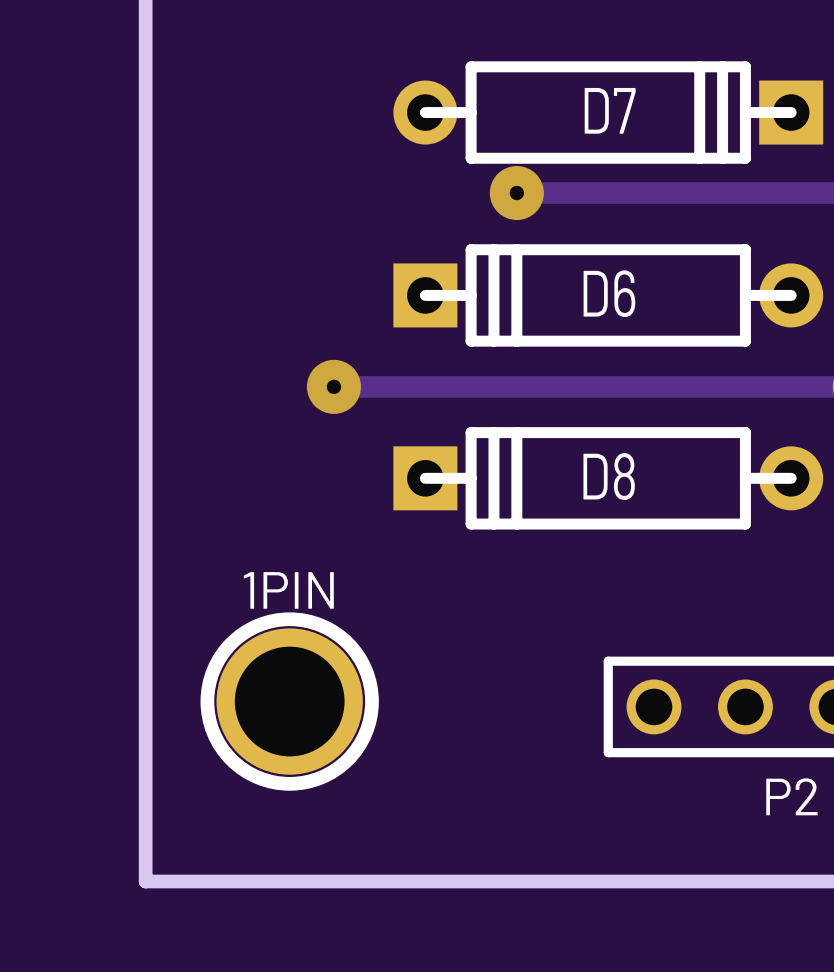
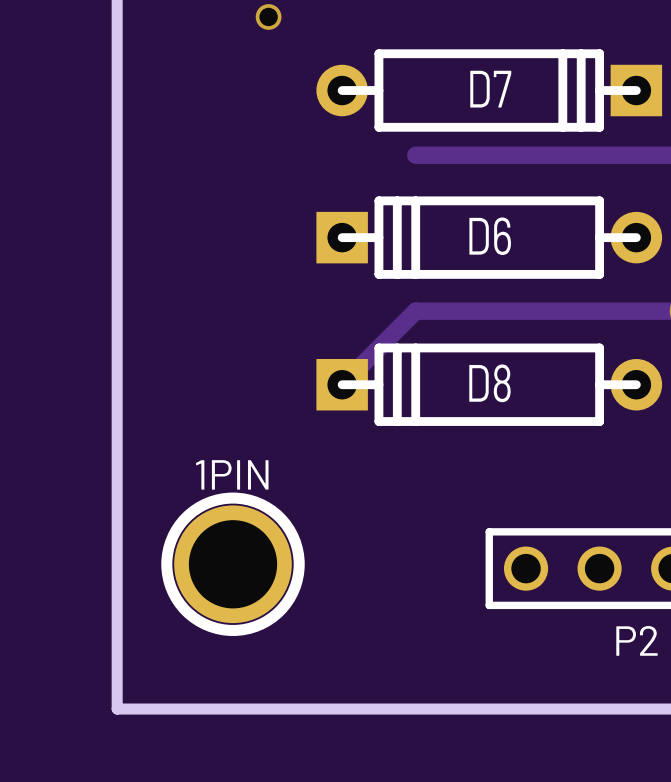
via: none -> (268, 16)
via: (516, 193) -> none
track: (333, 386) (516, 386) -> (342, 384) (415, 311)
via: (333, 386) -> none

